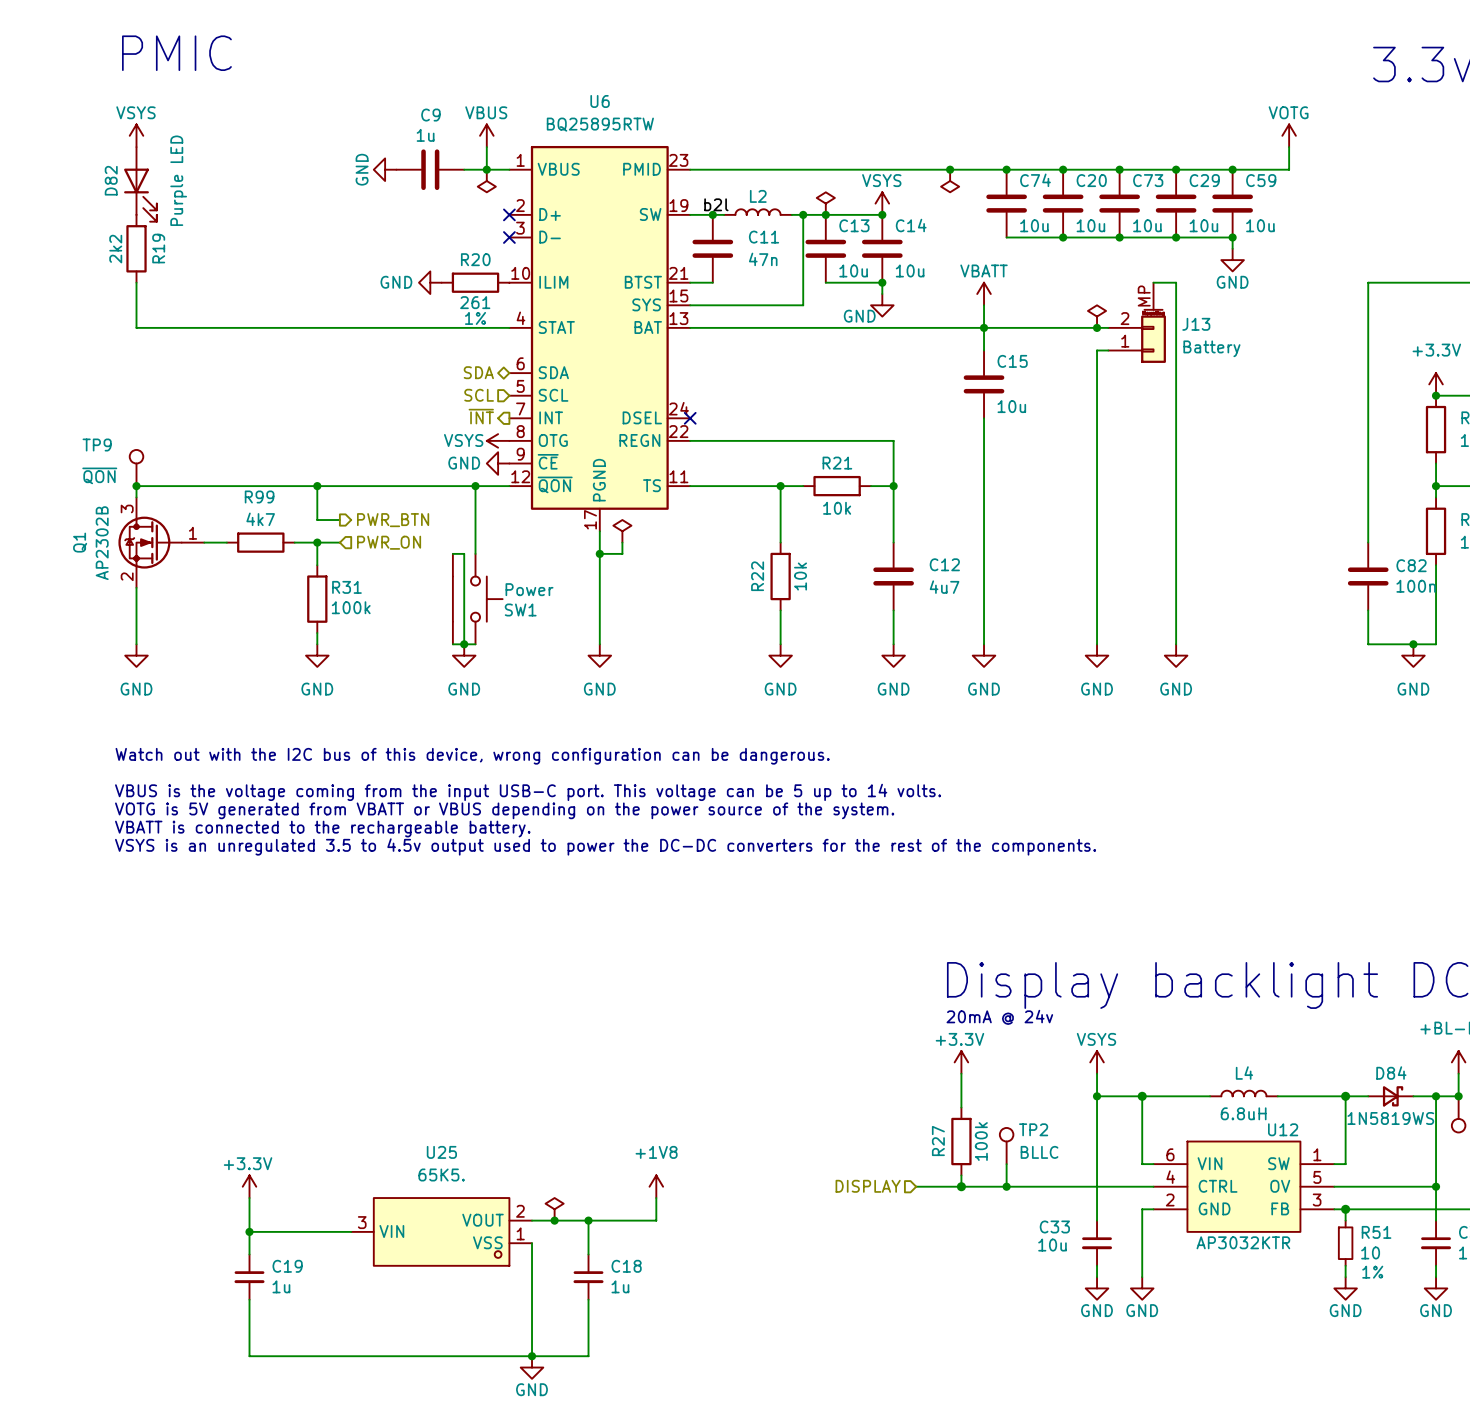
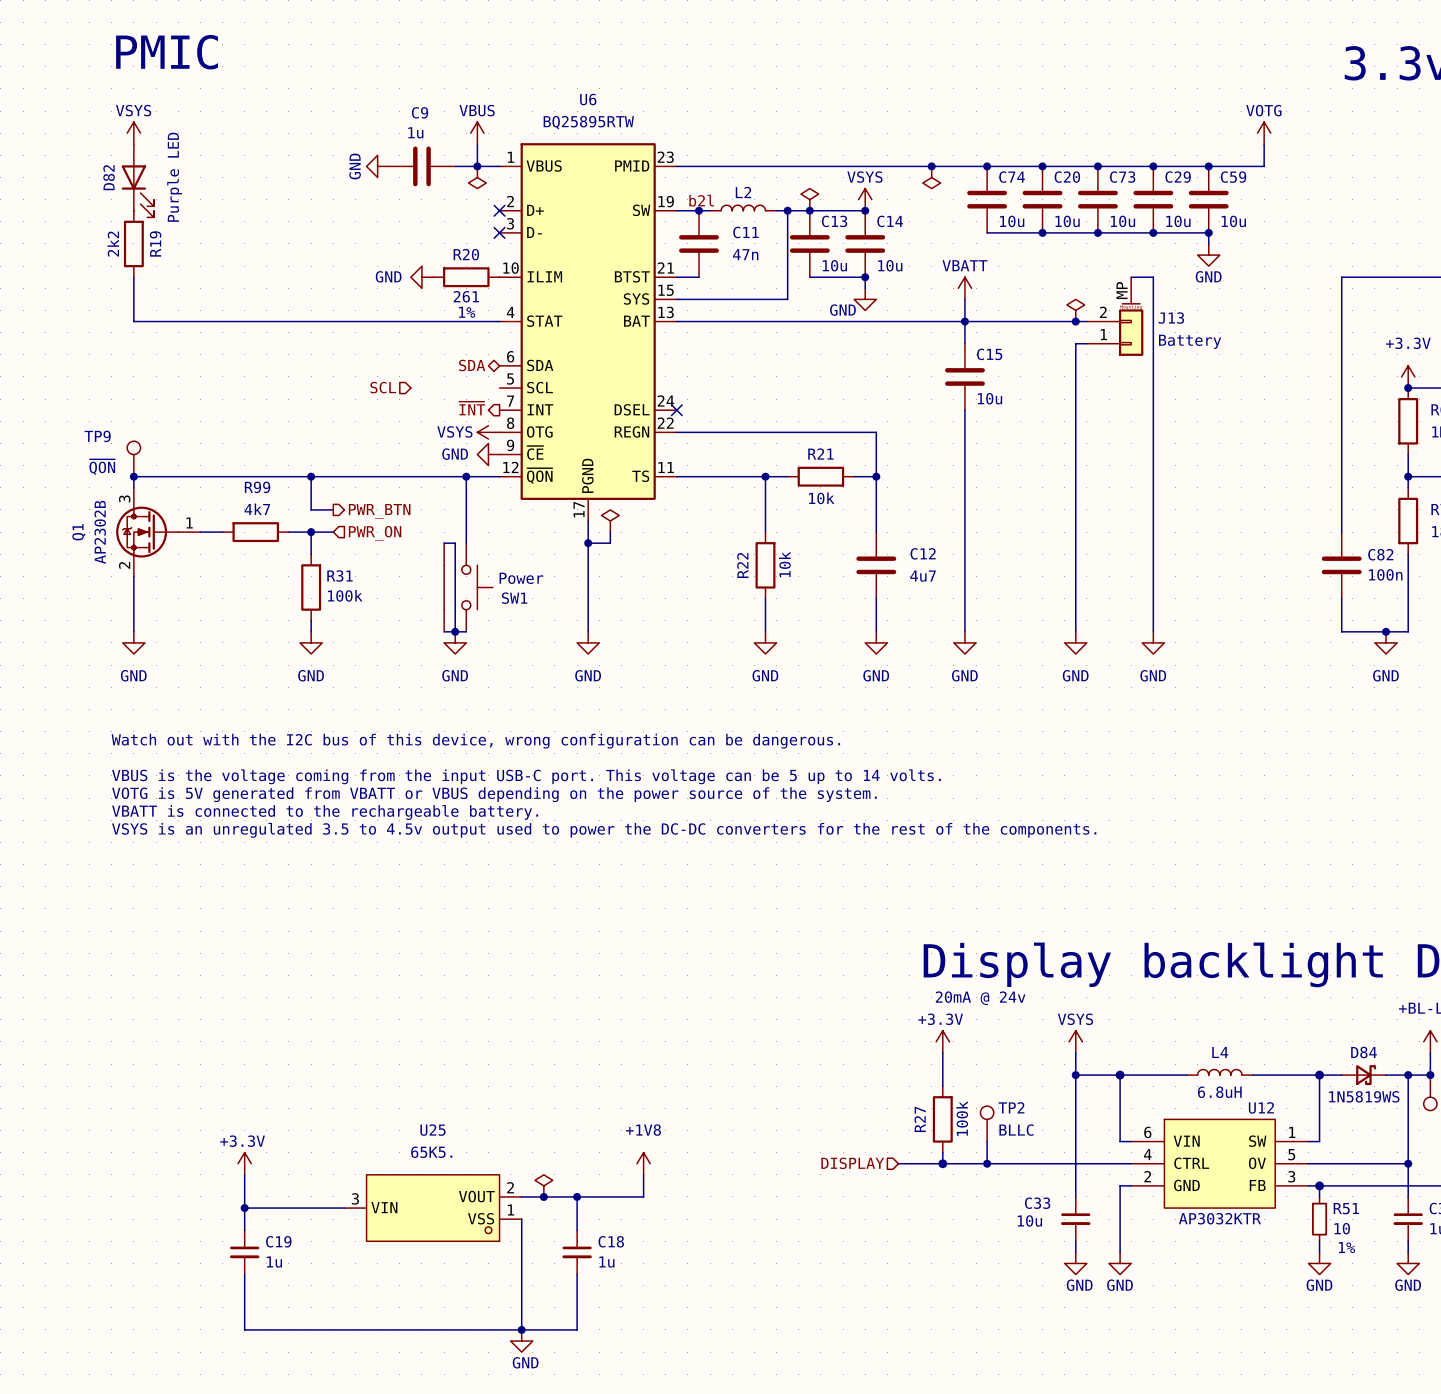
hierarchical label position: SCL (479, 395) -> SCL (383, 387)

